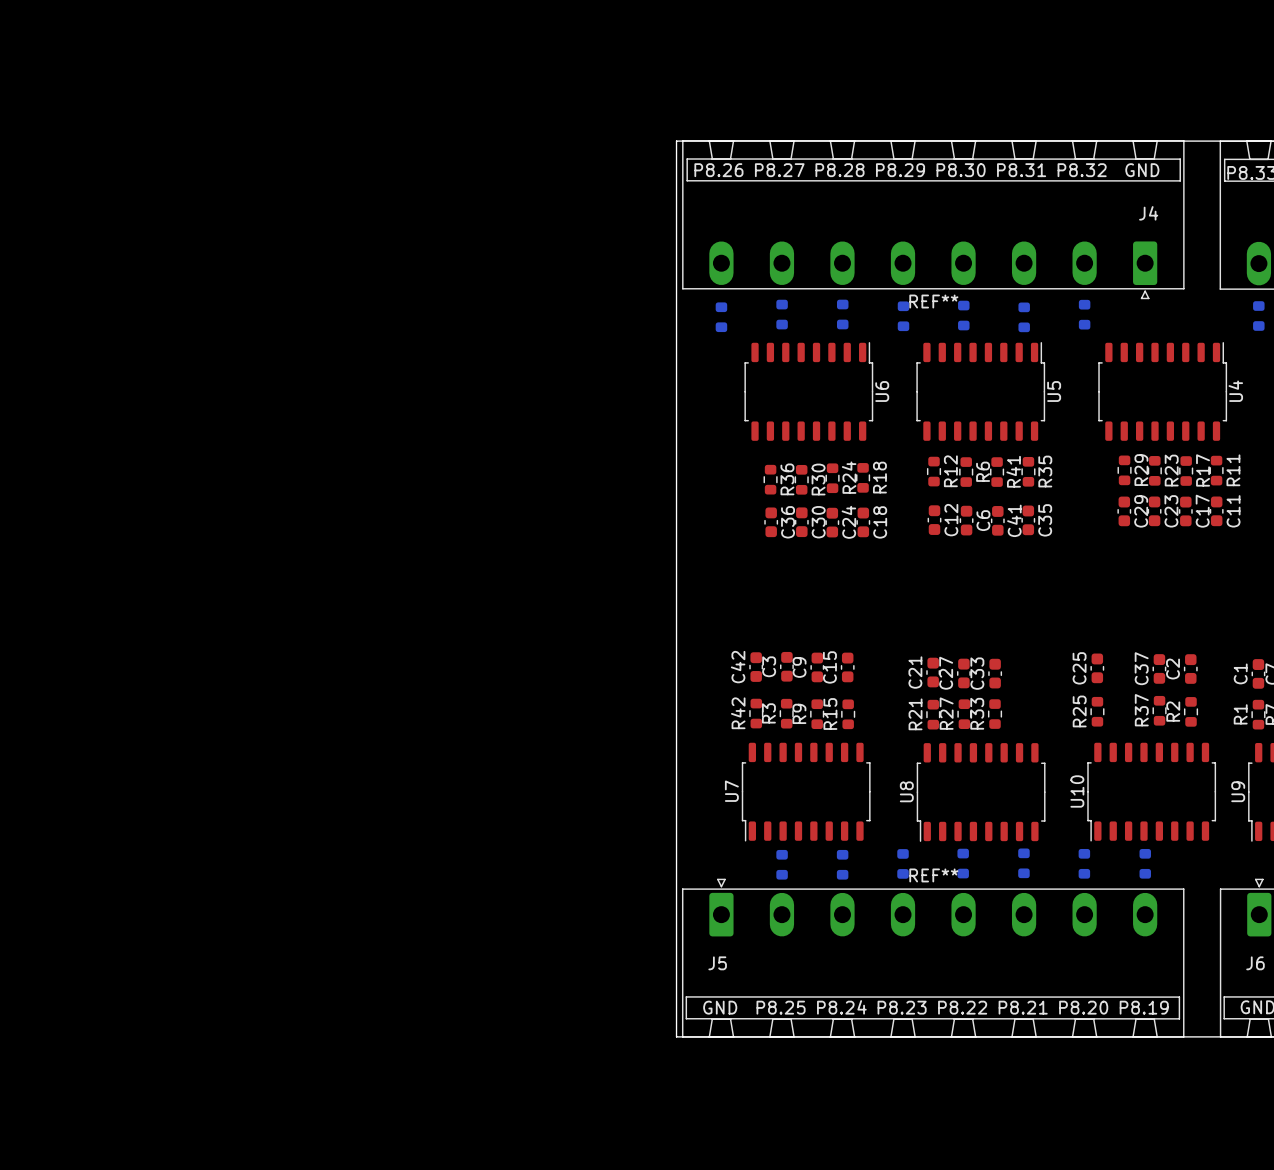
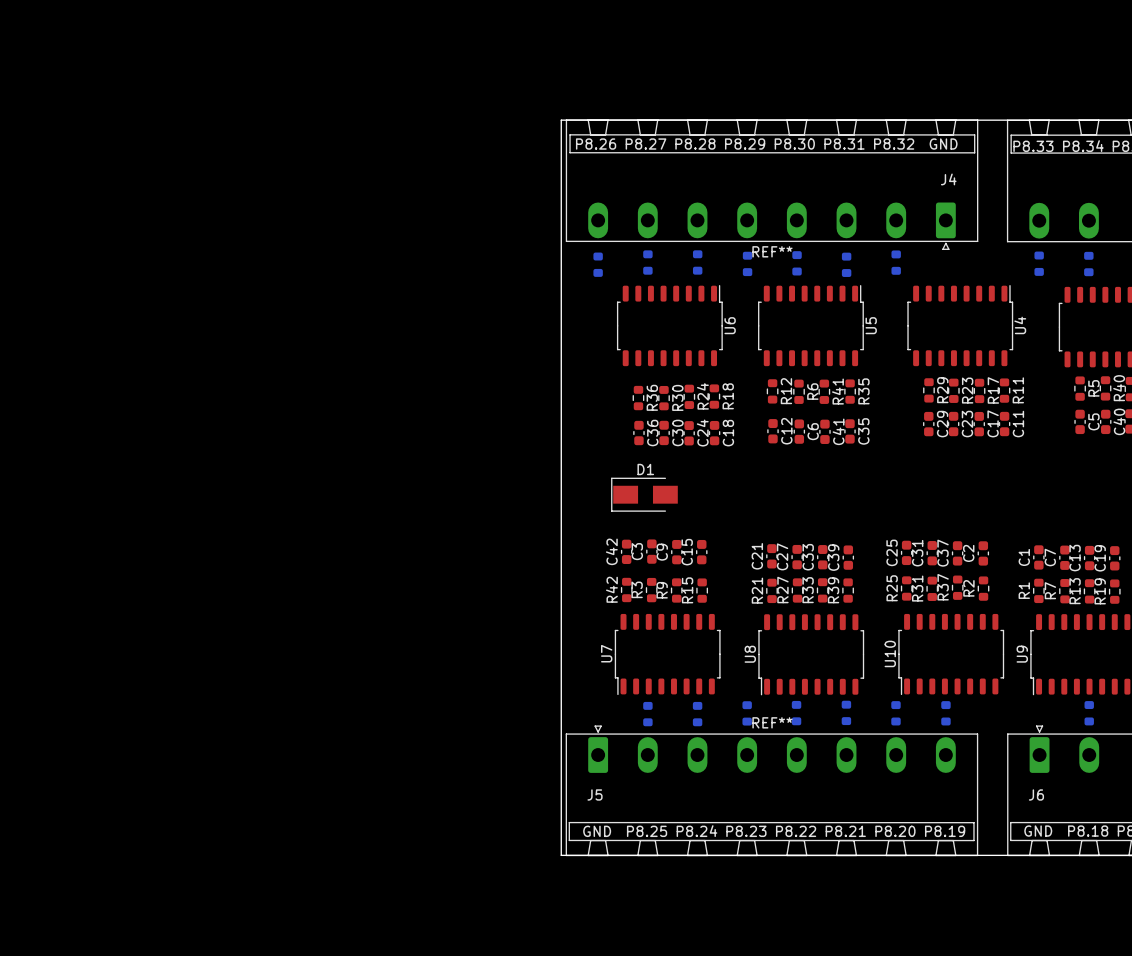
D1: none -> (644, 494)
C31: none -> (932, 553)
C39: none -> (848, 557)
R31: none -> (932, 588)
R39: none -> (848, 590)

